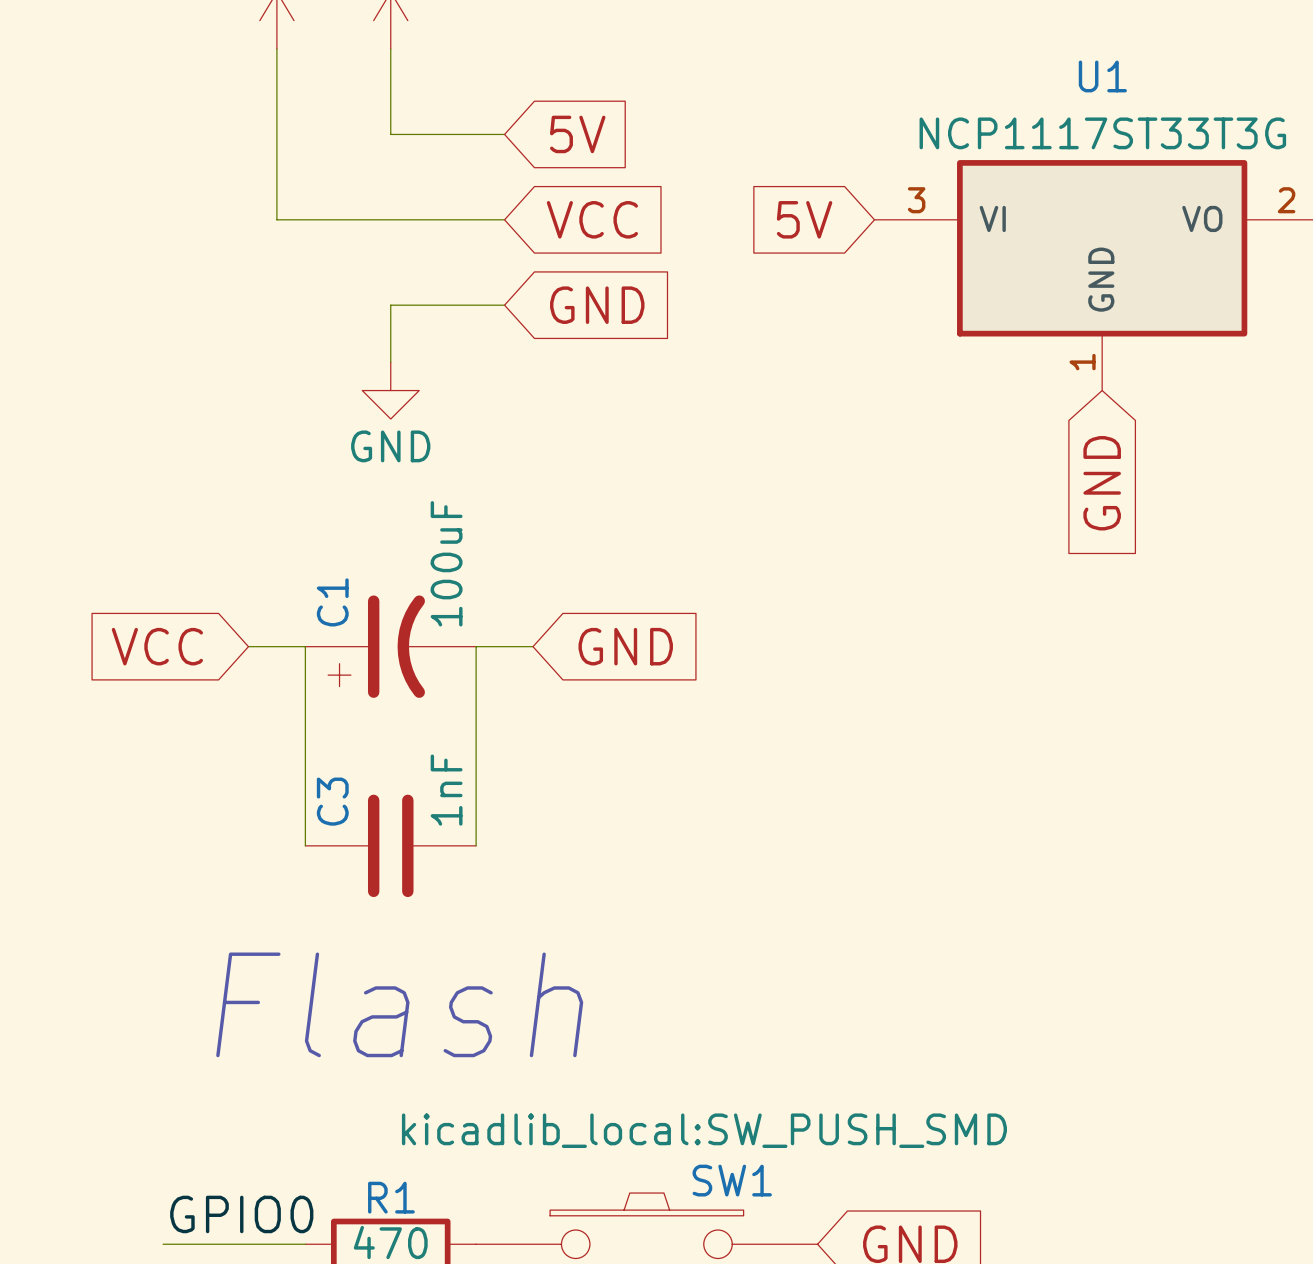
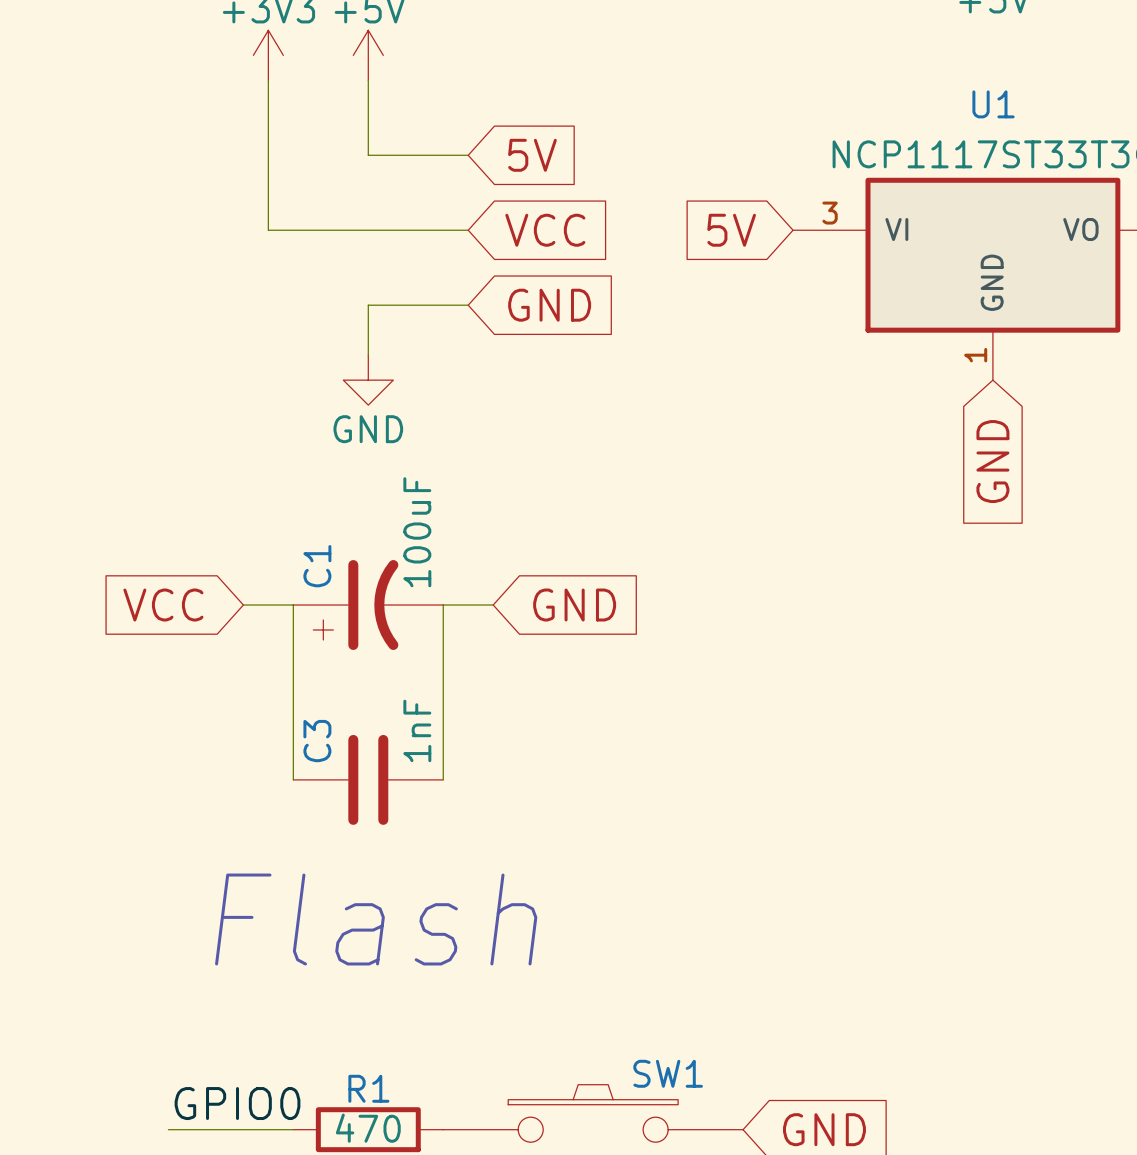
SW1 text: kicadlib_local:SW_PUSH_SMD (704, 1130) -> none

